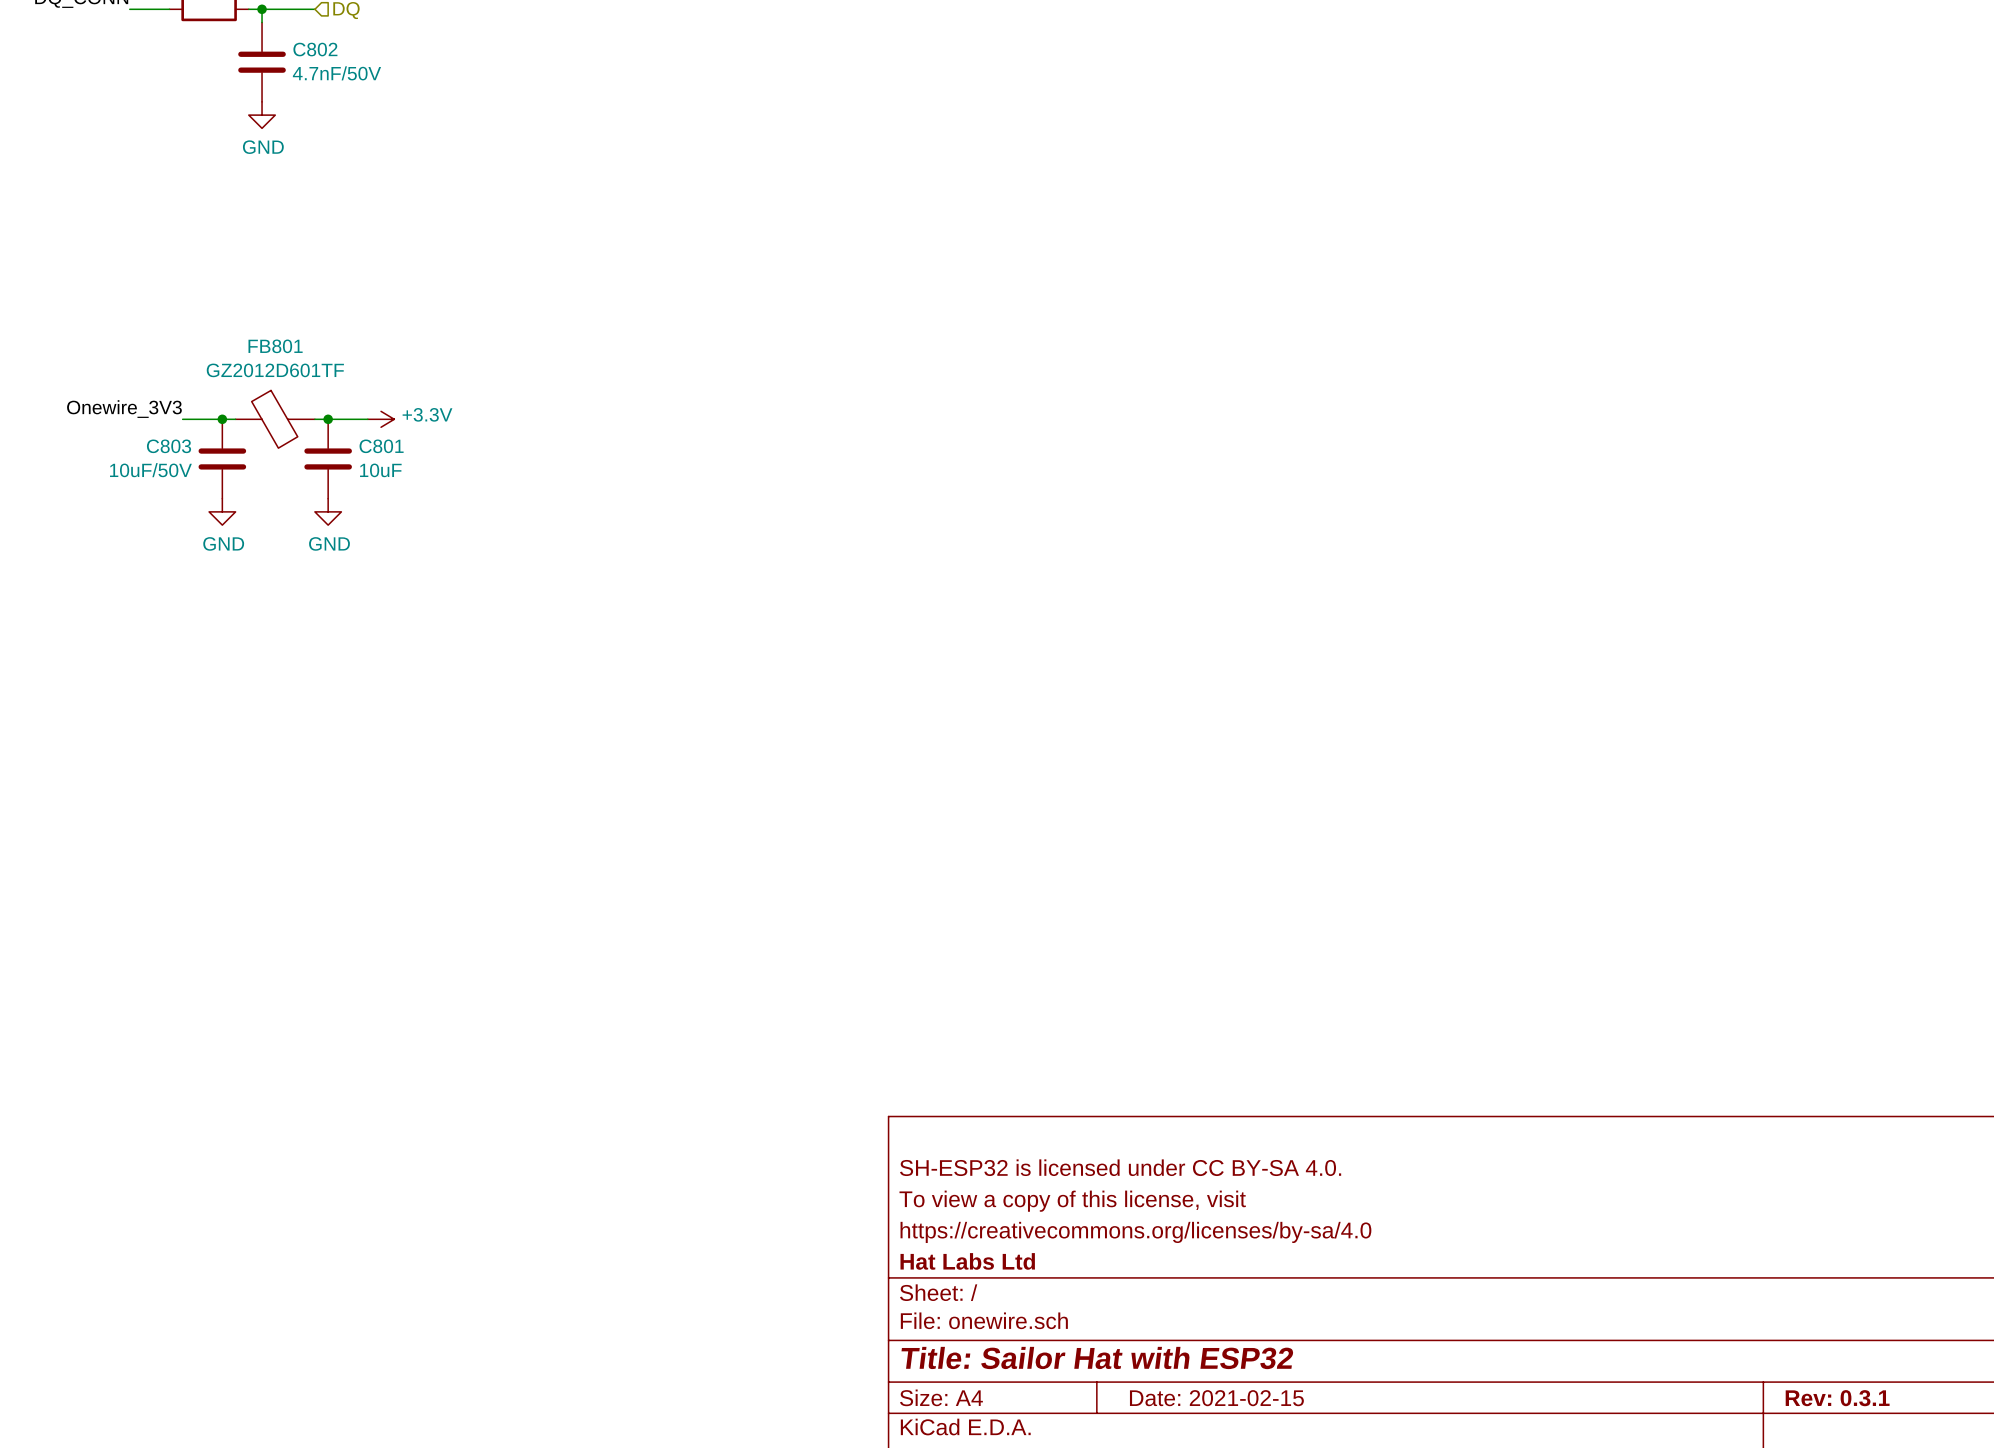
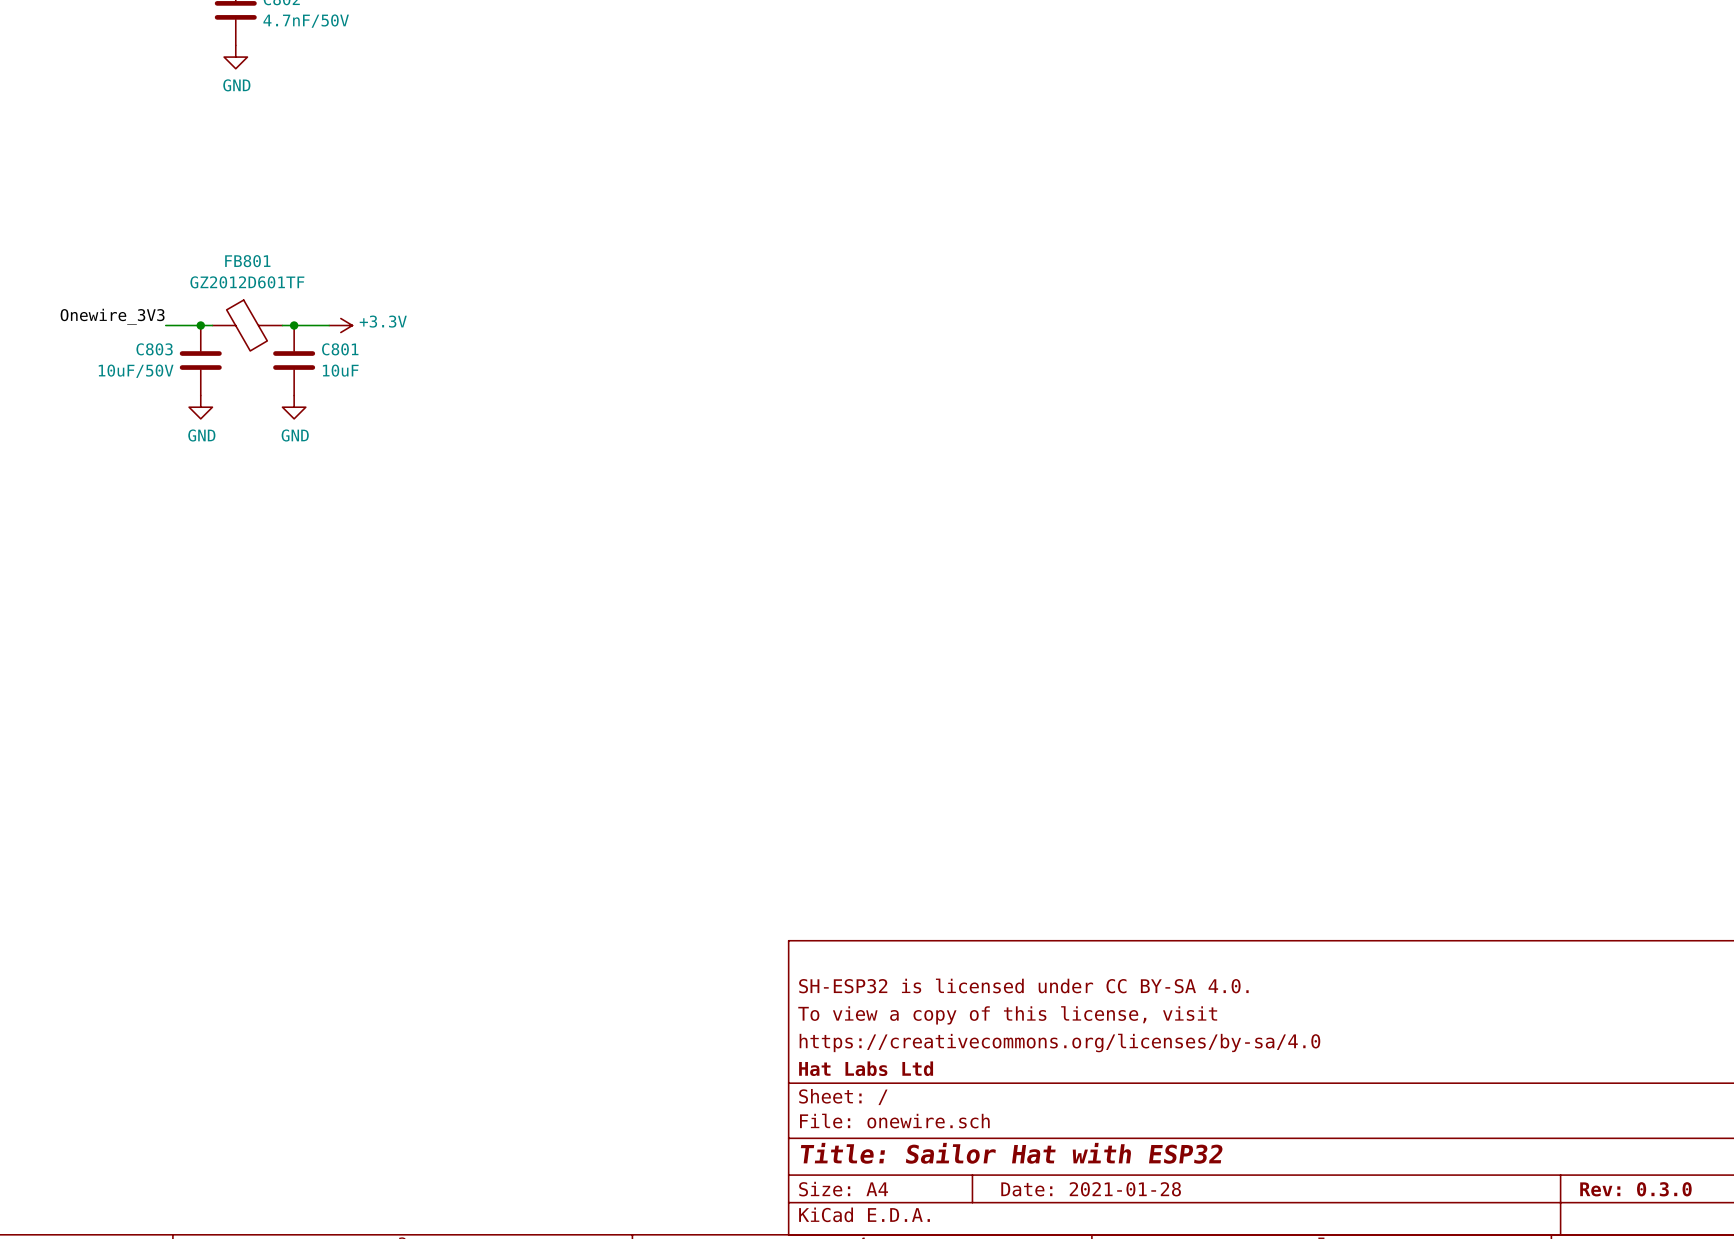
title block: Date: 2021-02-15 (1216, 1398) -> Date: 2021-01-28 (1091, 1189)
title block: Rev: 0.3.1 (1837, 1398) -> Rev: 0.3.0 (1635, 1189)

